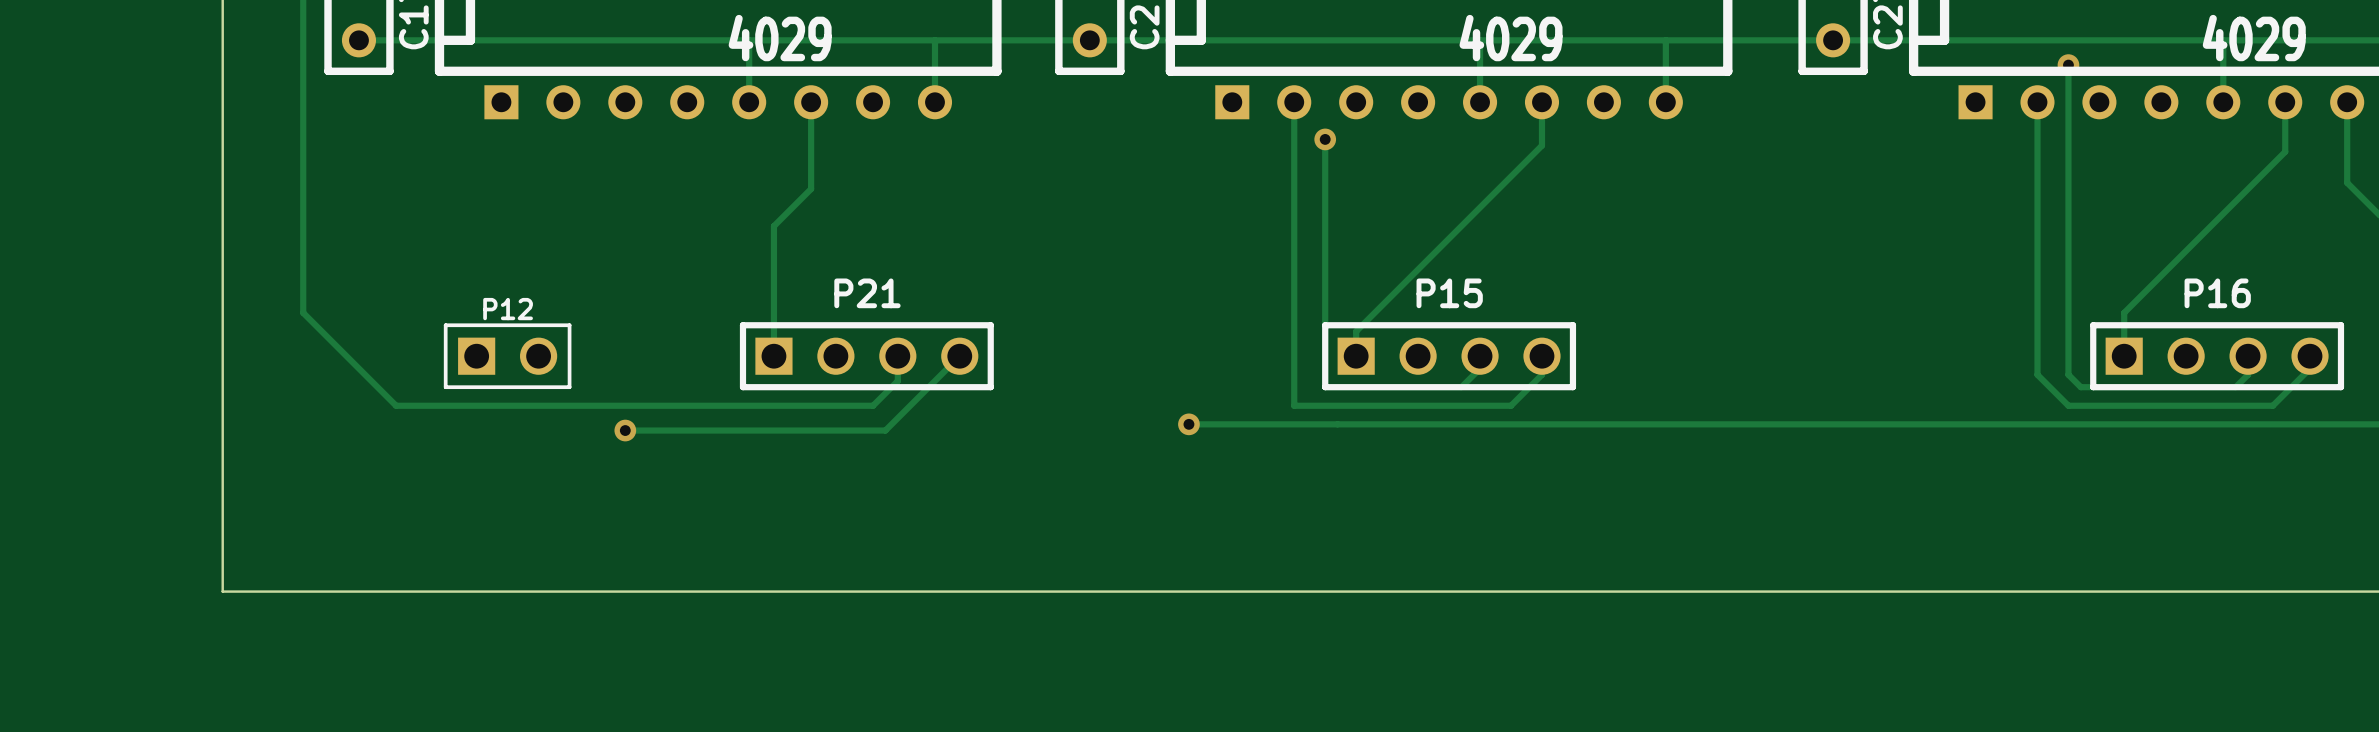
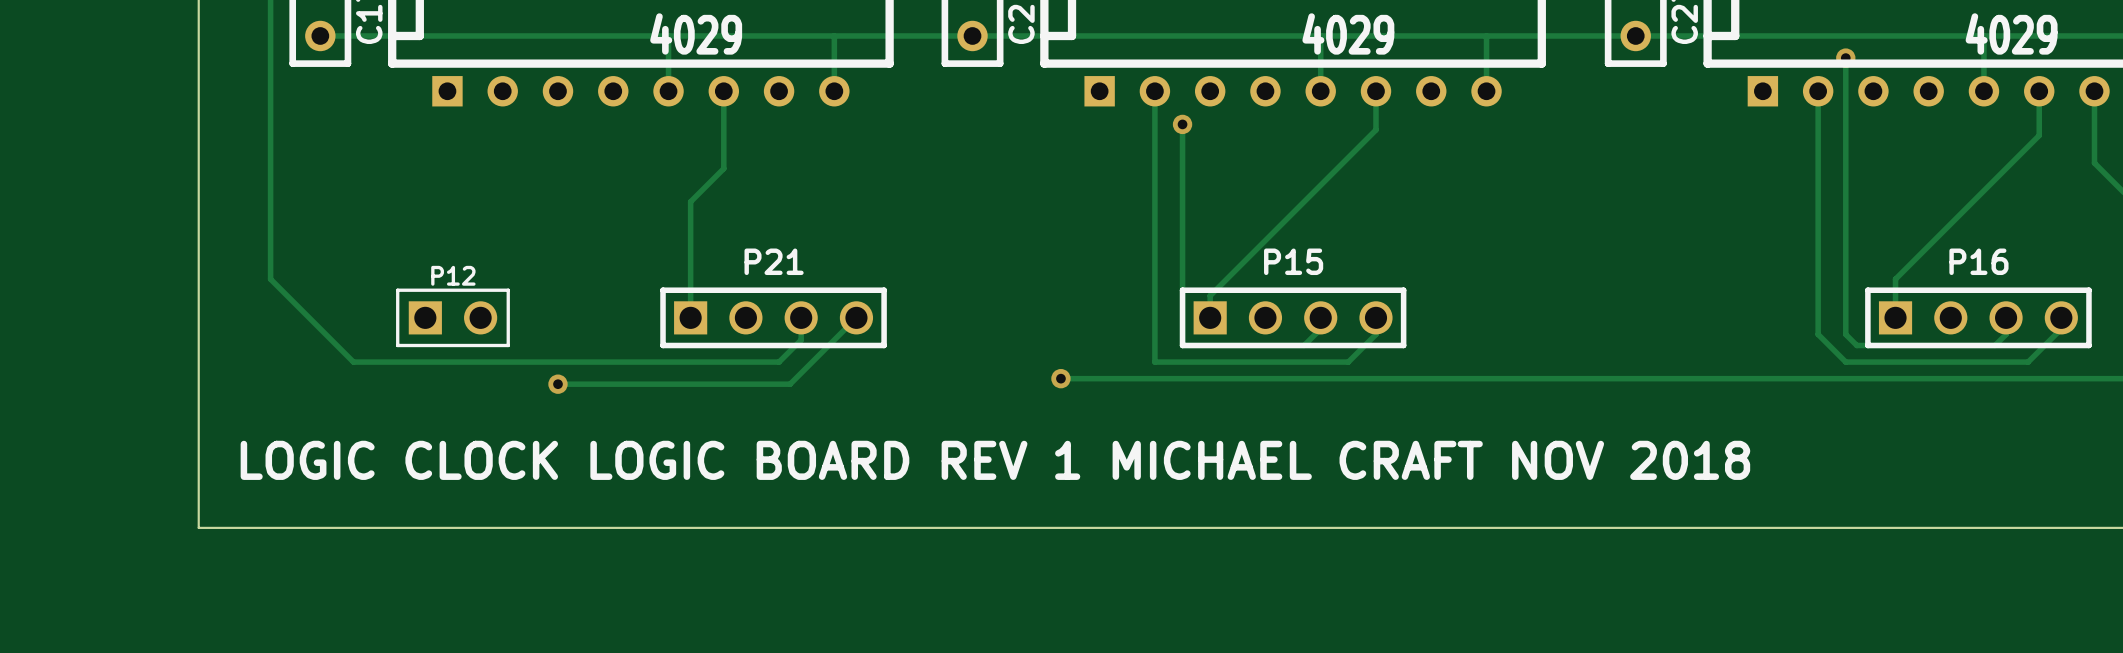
text: none -> LOGIC CLOCK LOGIC BOARD REV 1 MICHAEL CRAFT NOV 2018 (995, 460)

